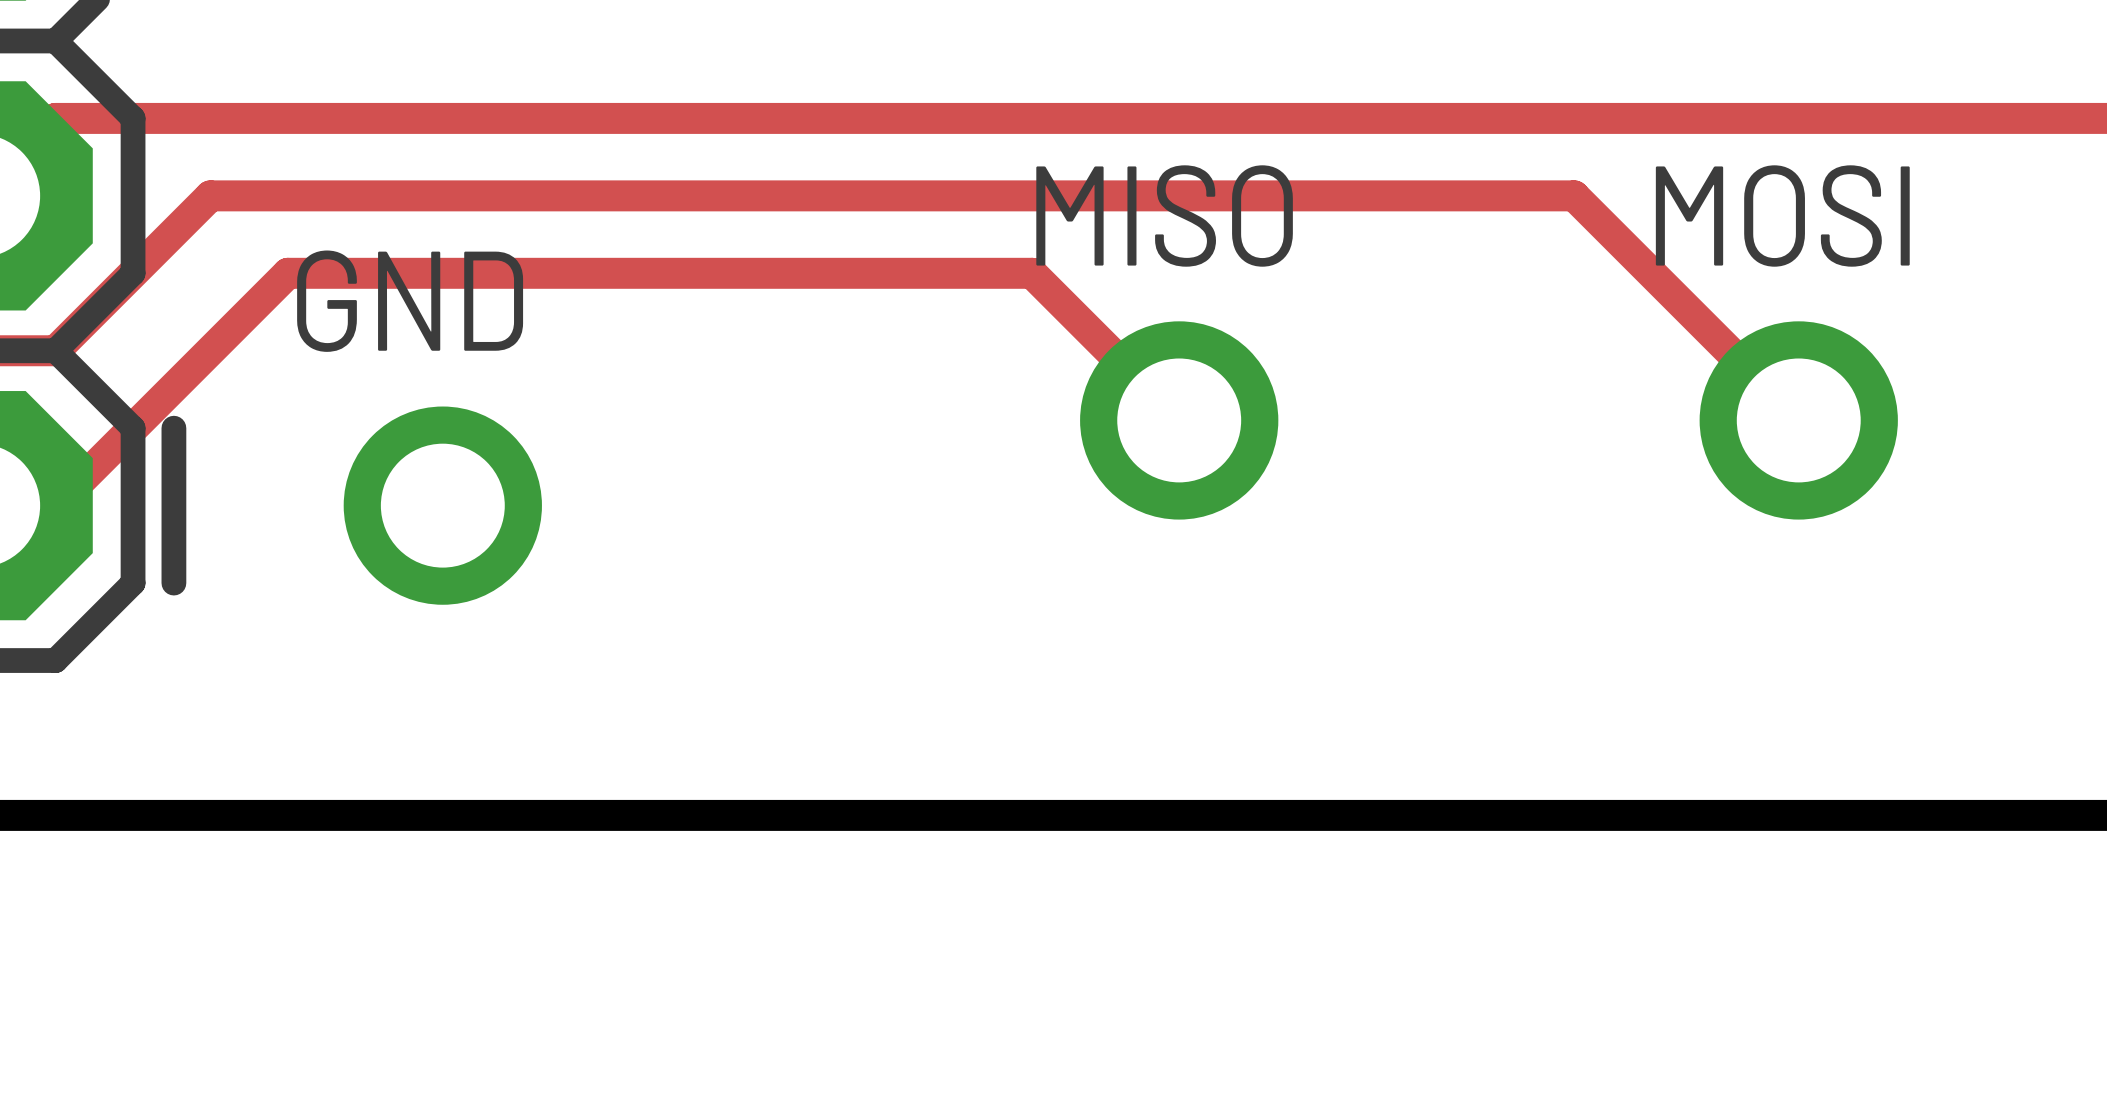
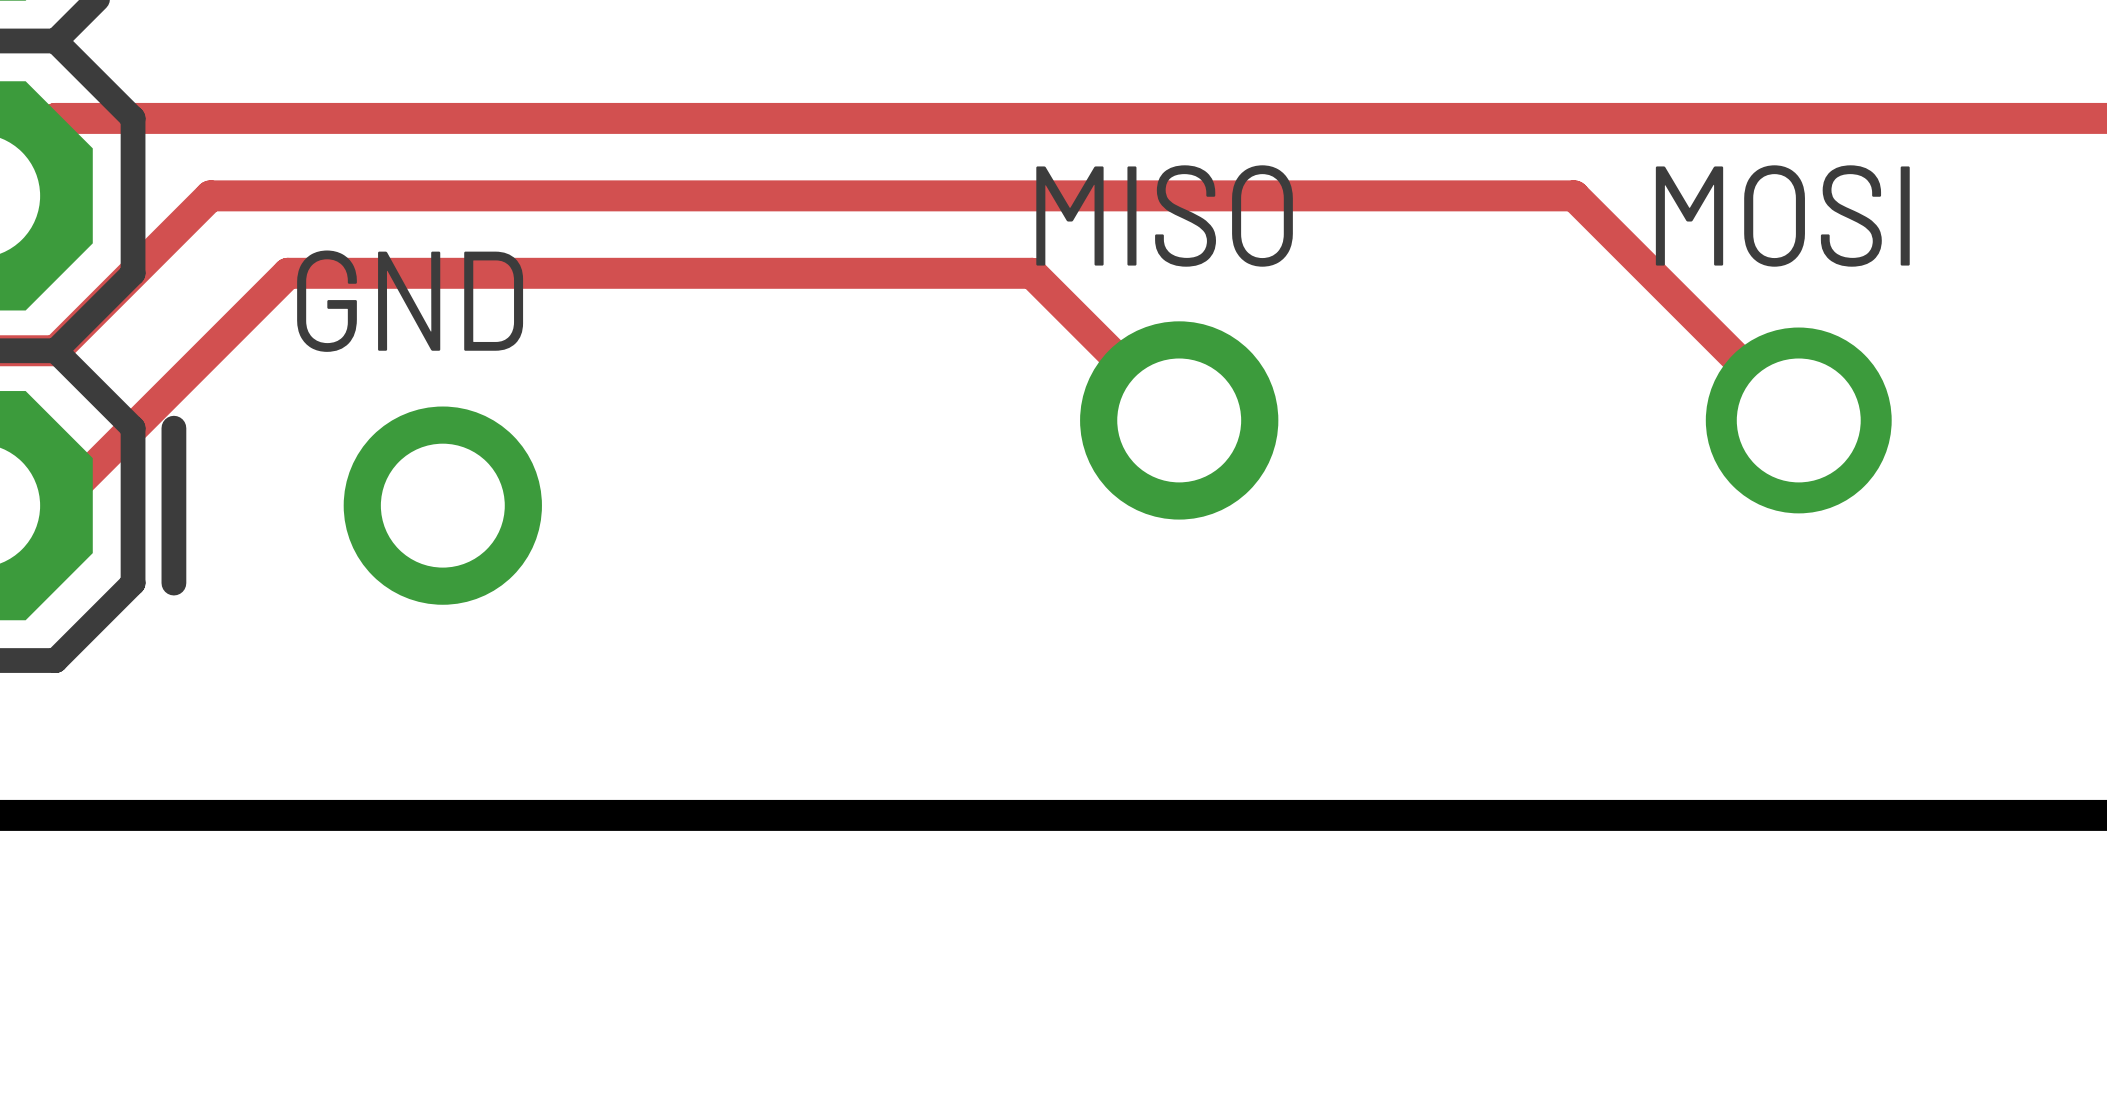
MOSI footprint: [1699, 321, 1898, 520] -> [1705, 327, 1892, 514]

